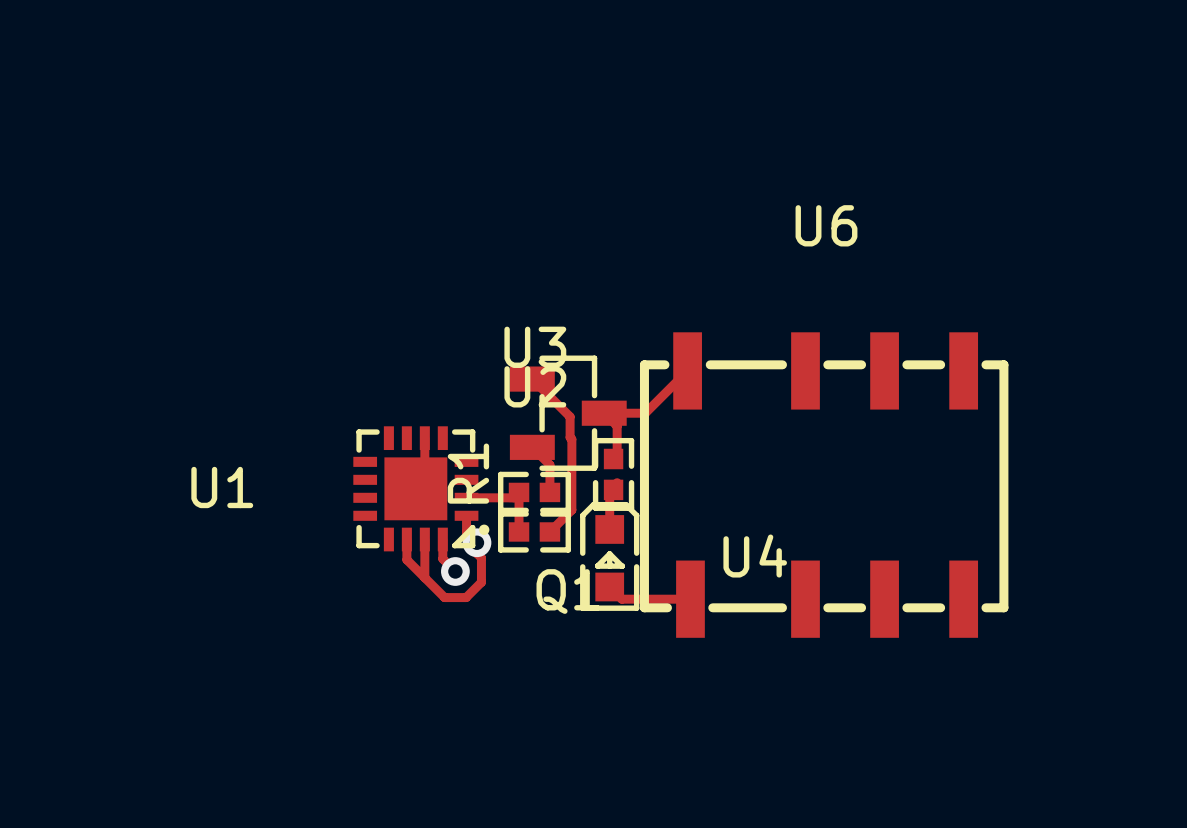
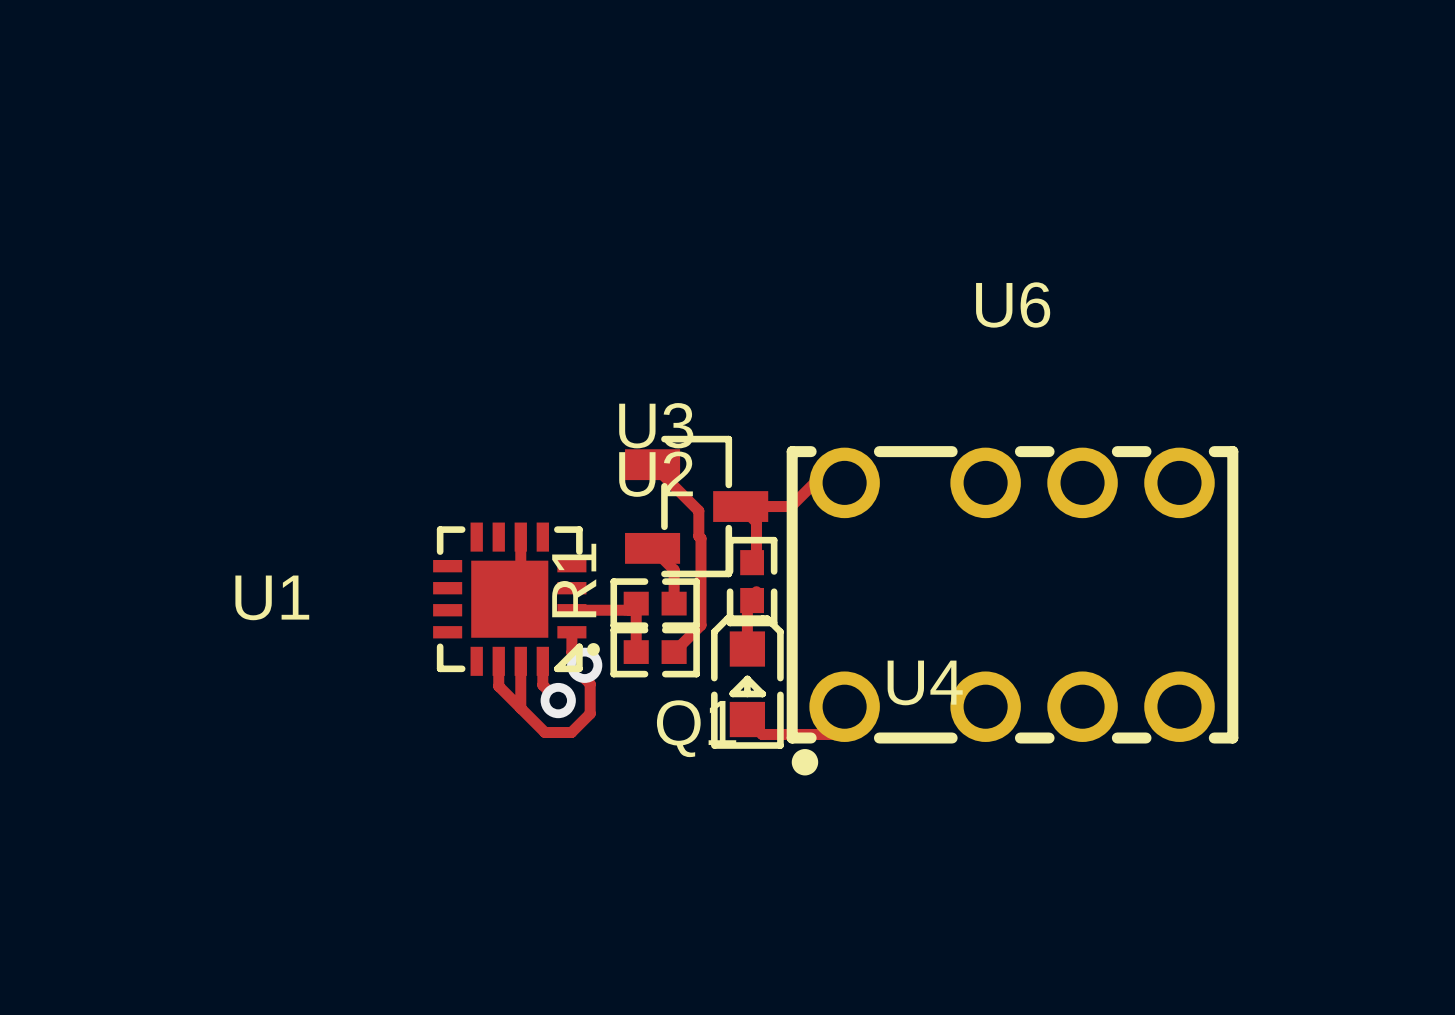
U6 footprint: [639, 332, 1009, 638] -> [786, 446, 1239, 776]

